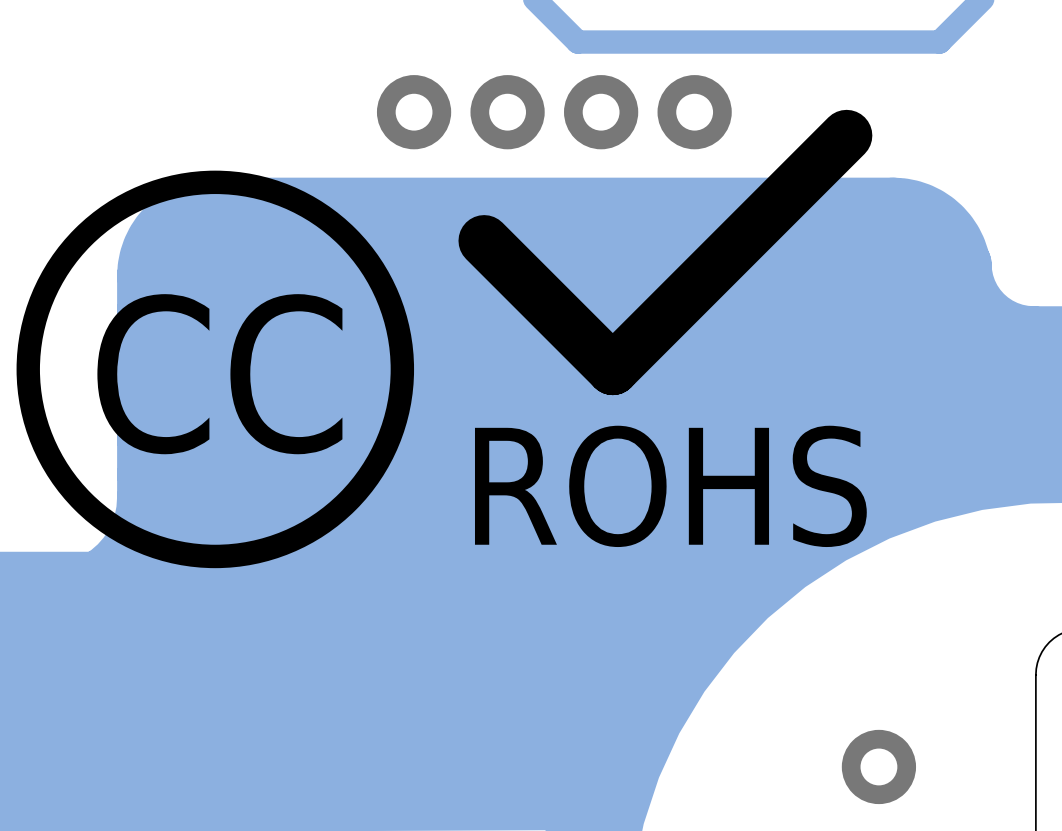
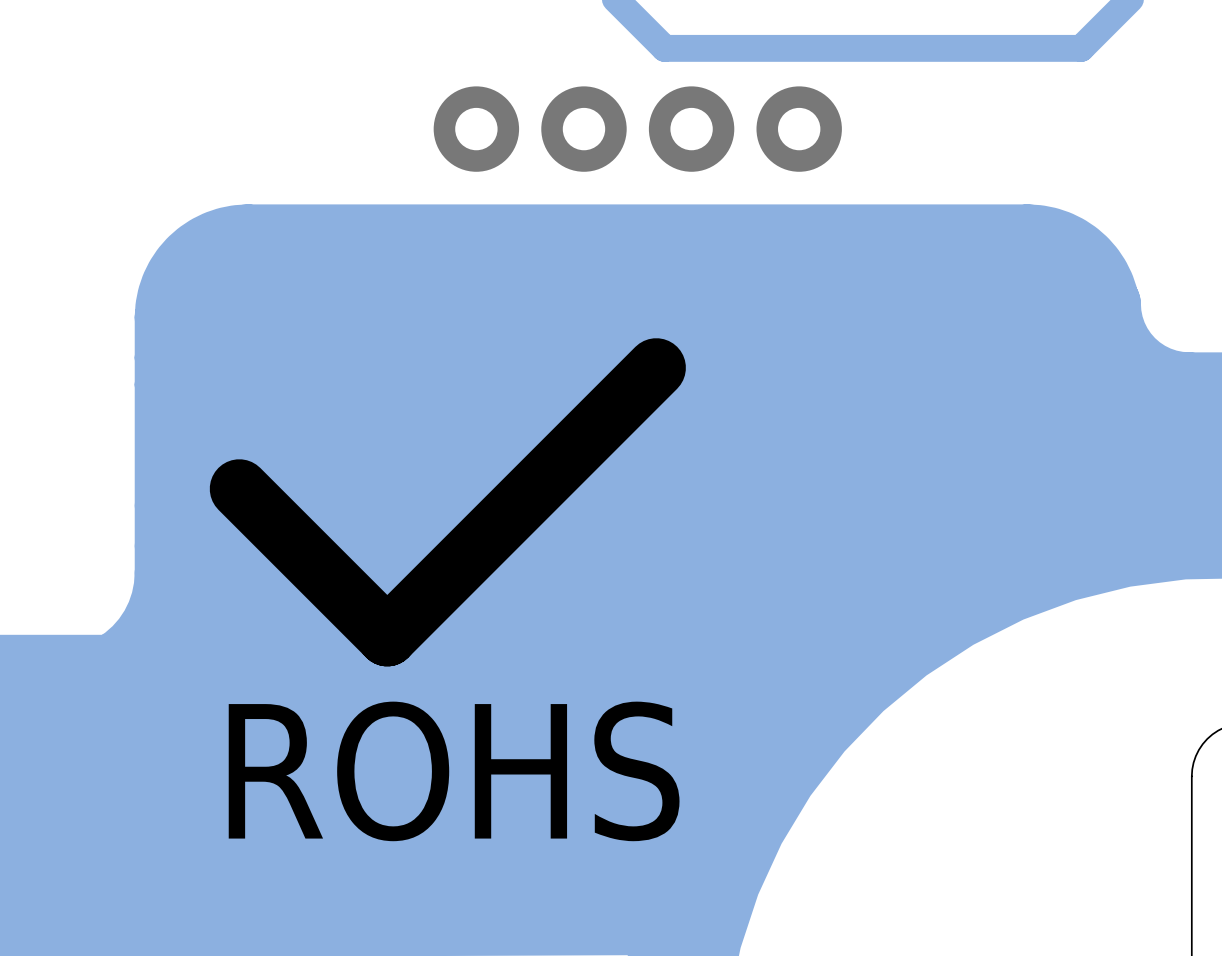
line: (846, 135) (612, 369) (484, 240) -> (656, 367) (387, 636) (239, 488)
drawing: [16, 170, 415, 569] -> none
text: CC (219, 374) -> none
text position: ROHS (670, 486) -> ROHS (454, 771)
via: (878, 766) -> none

